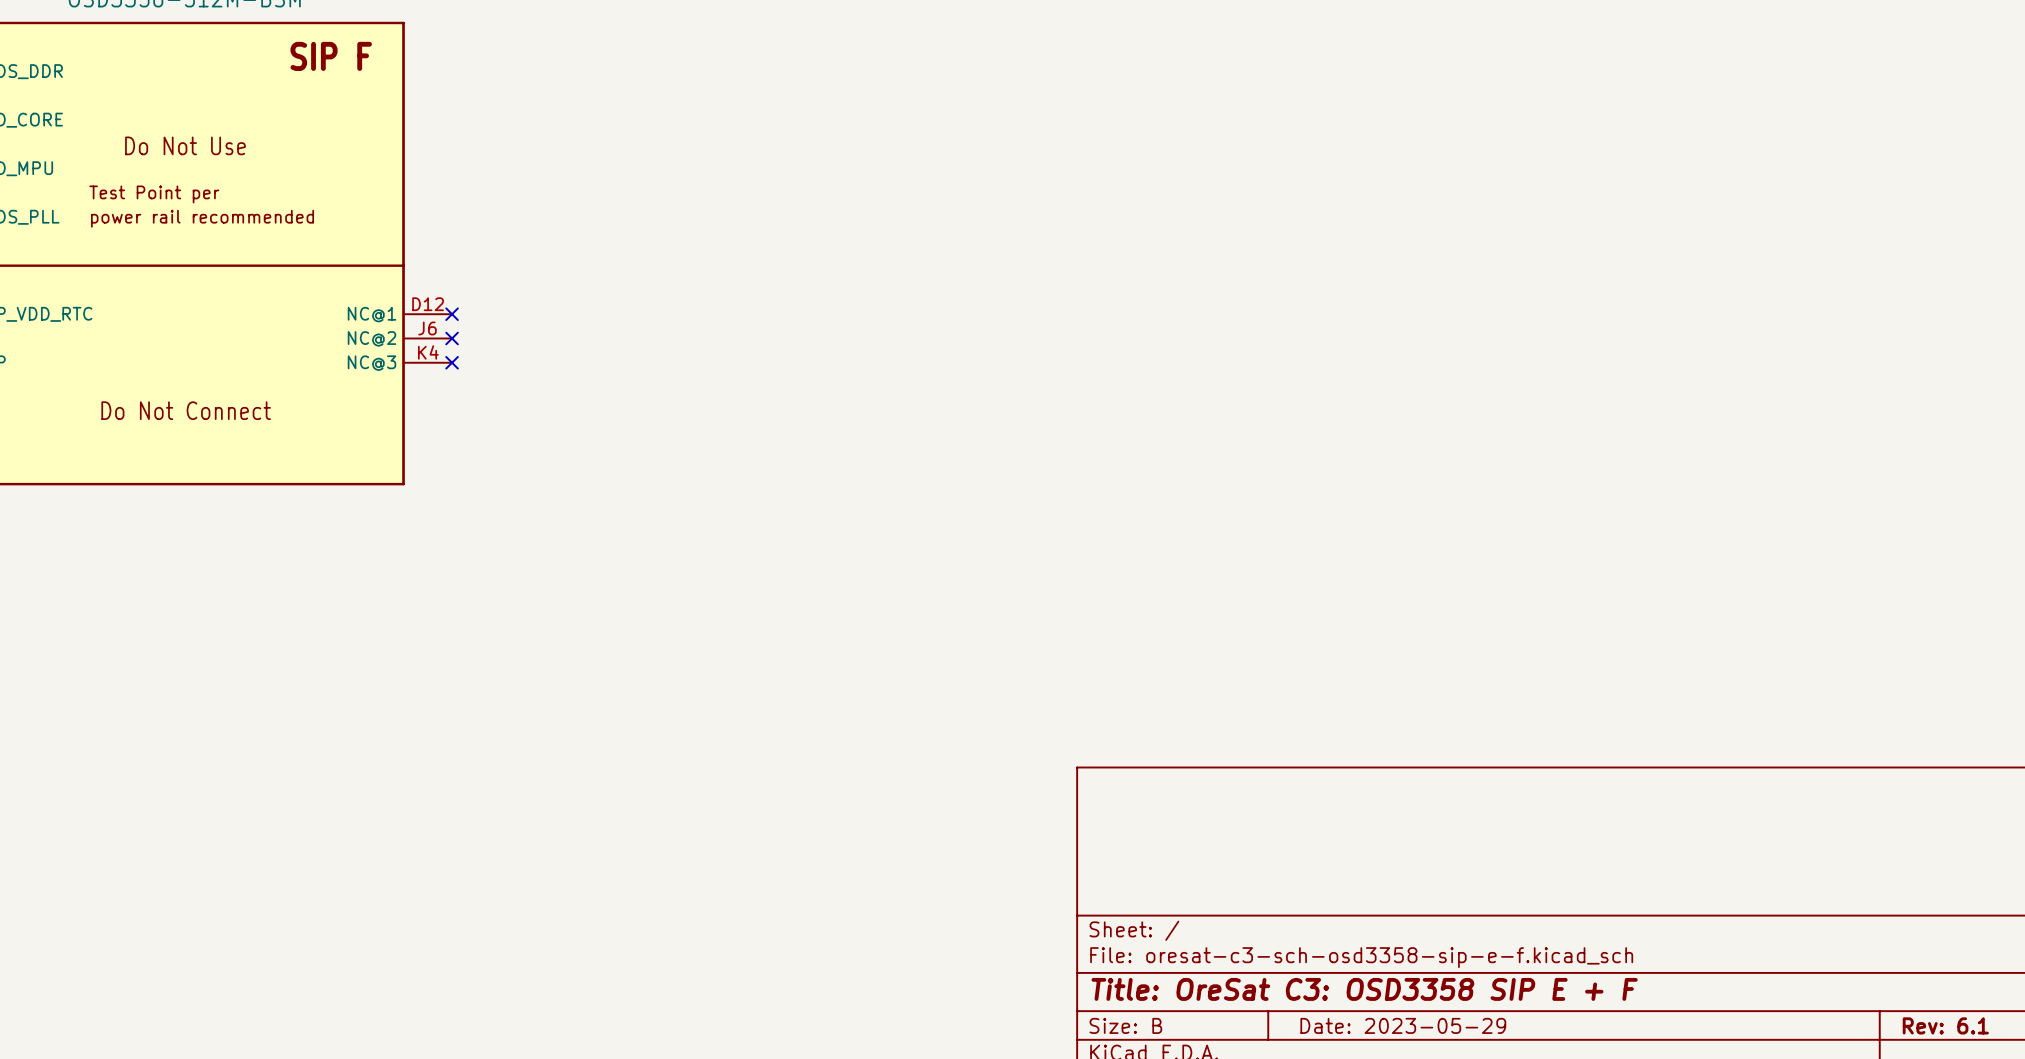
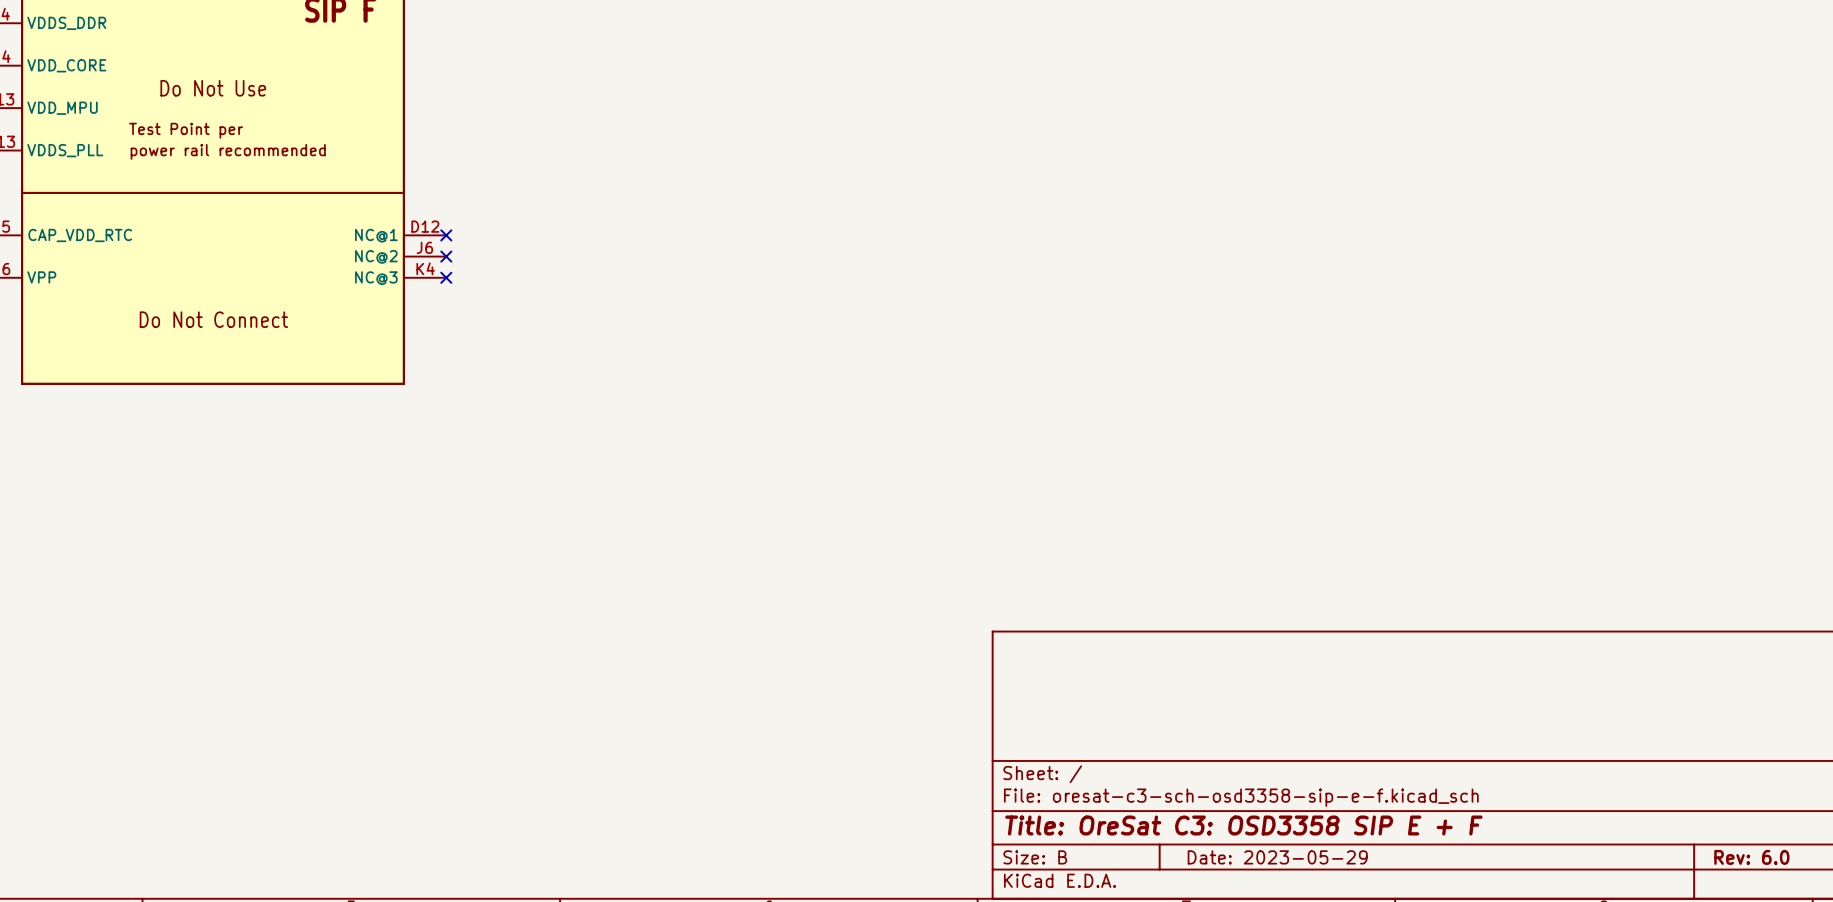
title block: Rev: 6.1 (1945, 1025) -> Rev: 6.0 (1751, 857)

